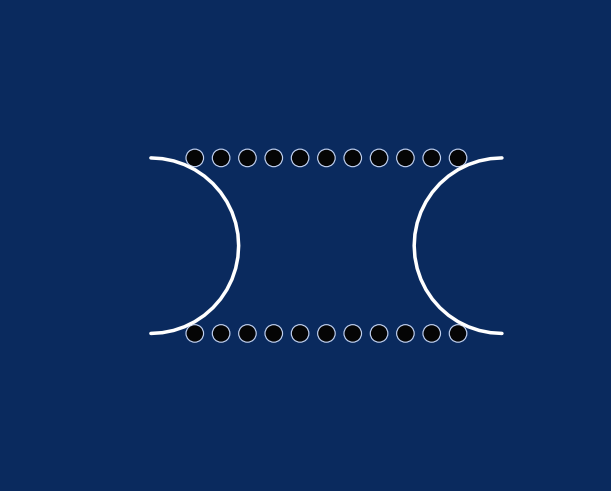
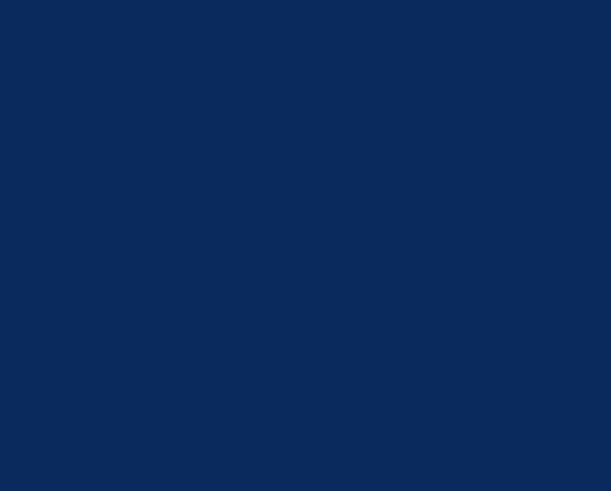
part: (326, 245) -> none

